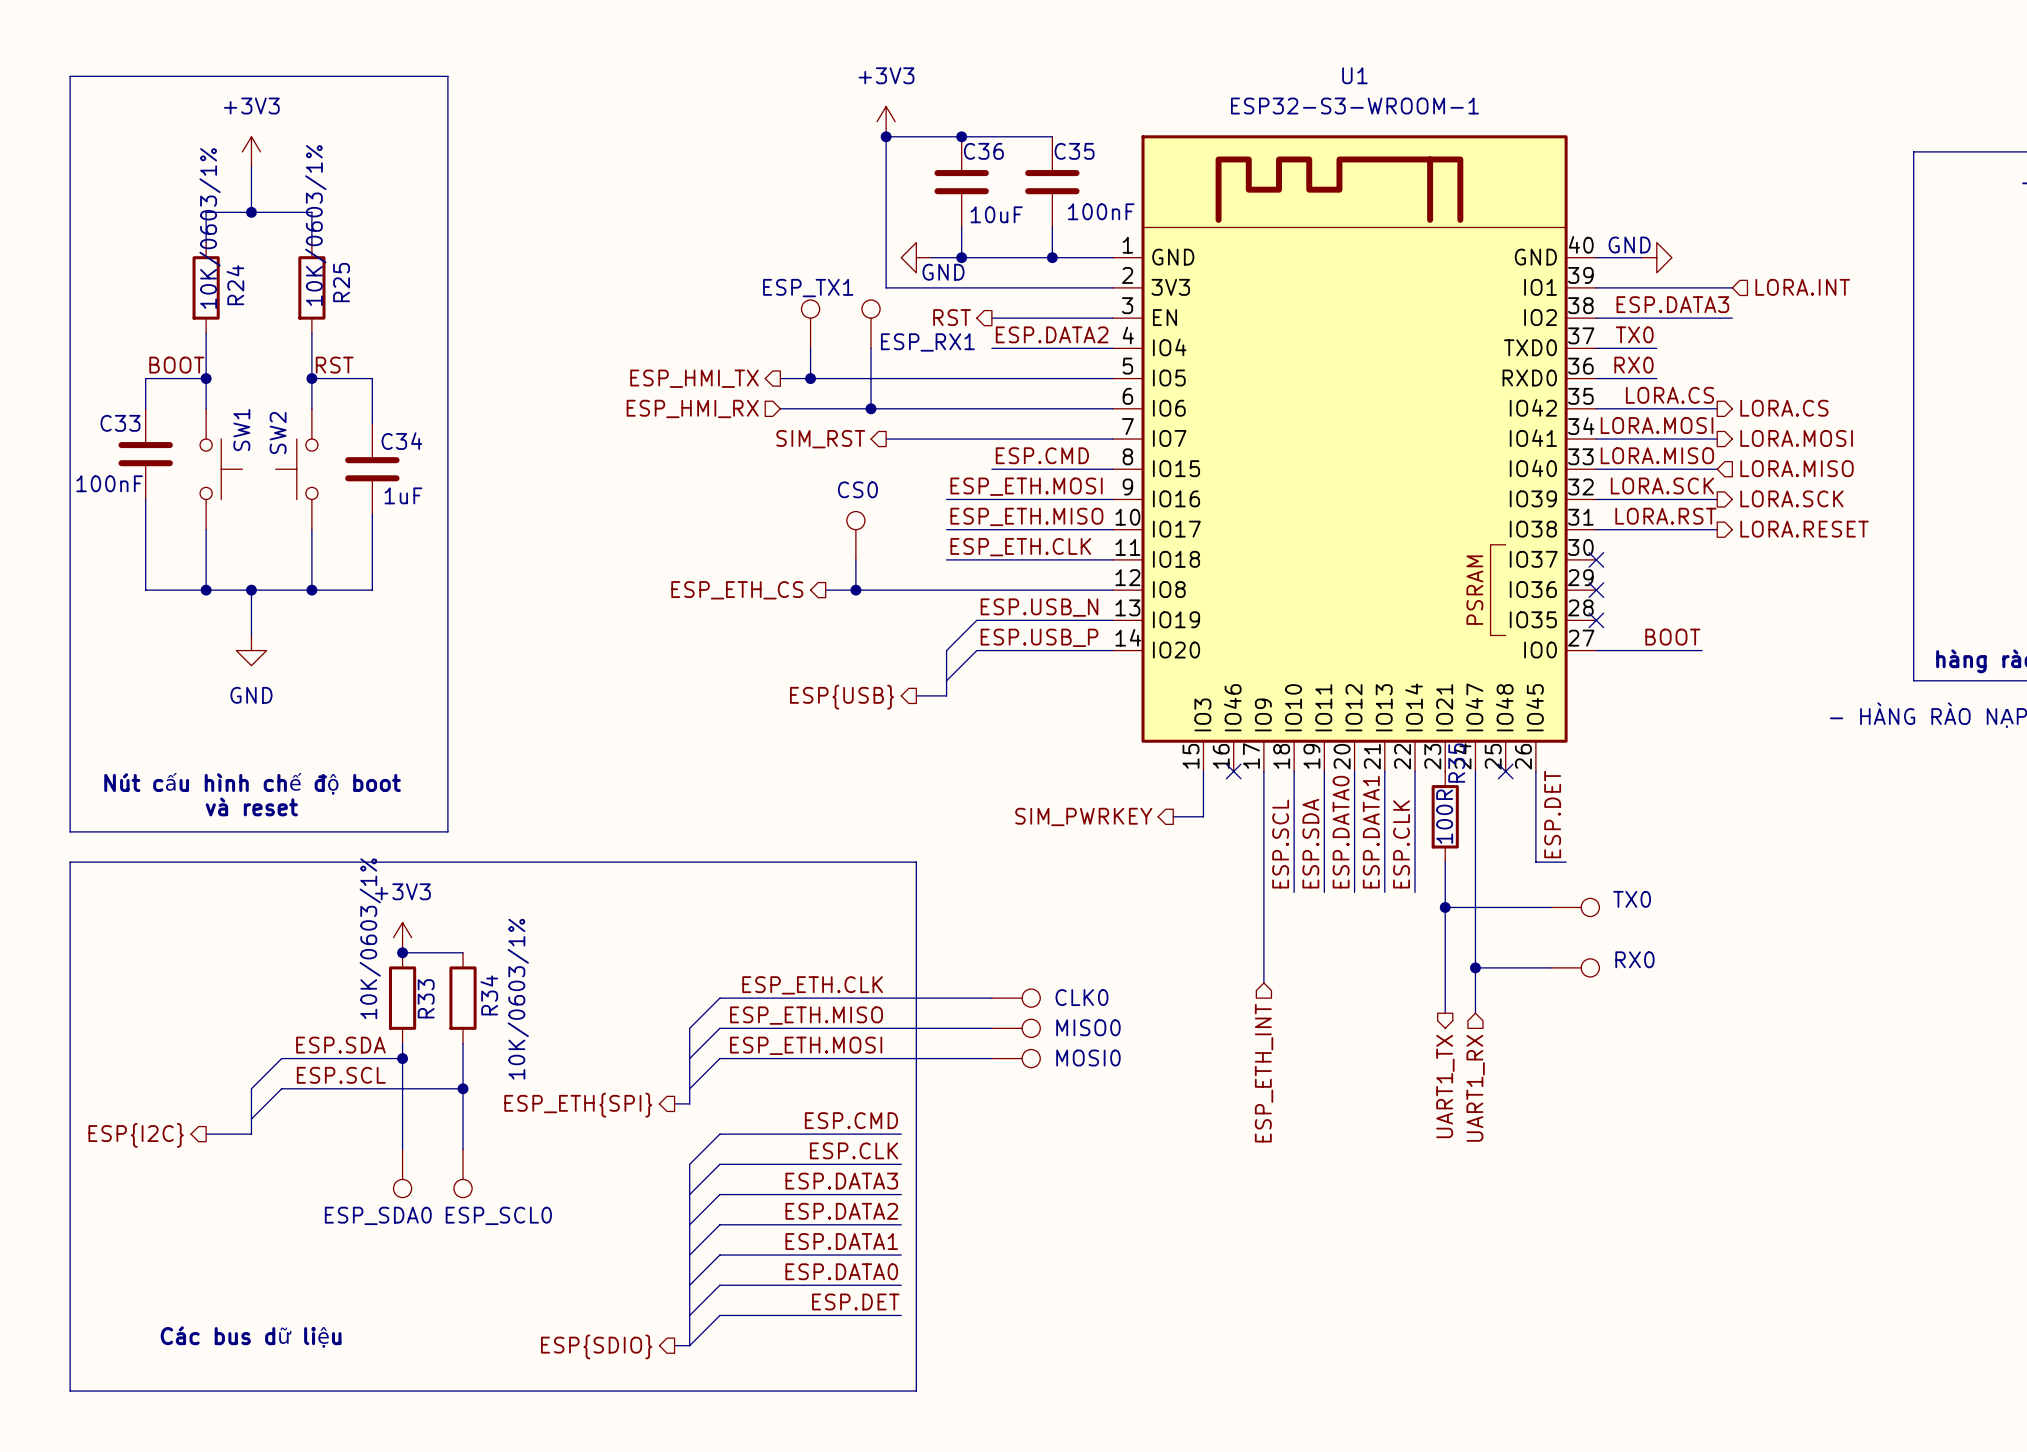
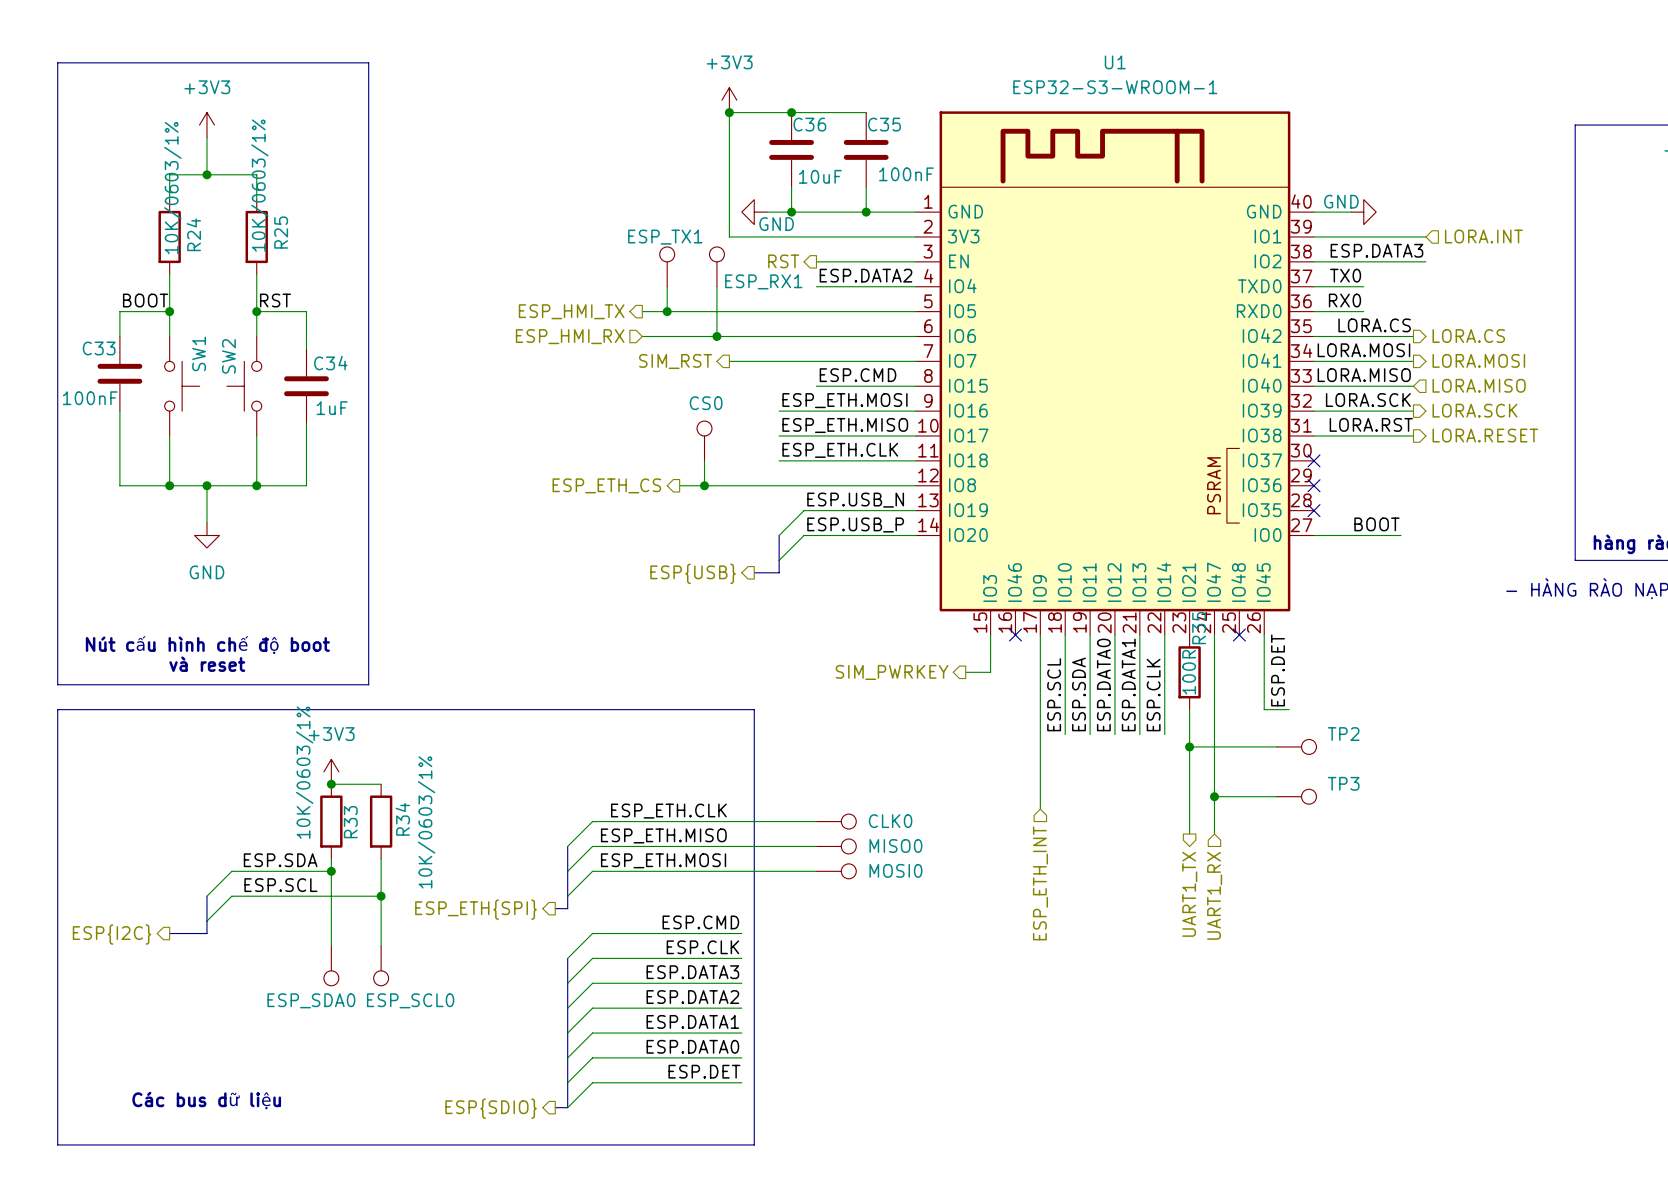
TX0 name: TX0 (1632, 899) -> TP2 (1343, 734)
RX0 name: RX0 (1634, 959) -> TP3 (1343, 783)

